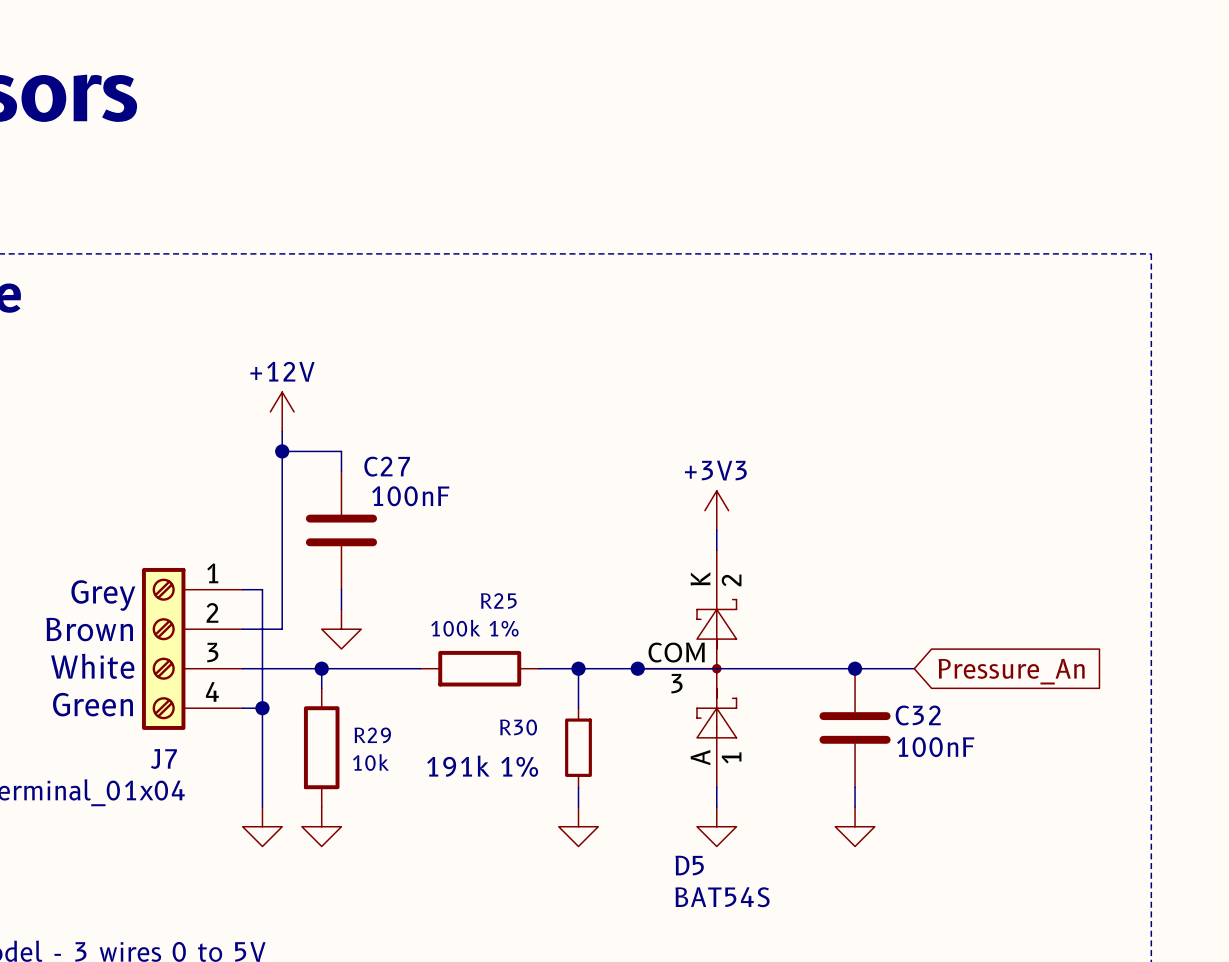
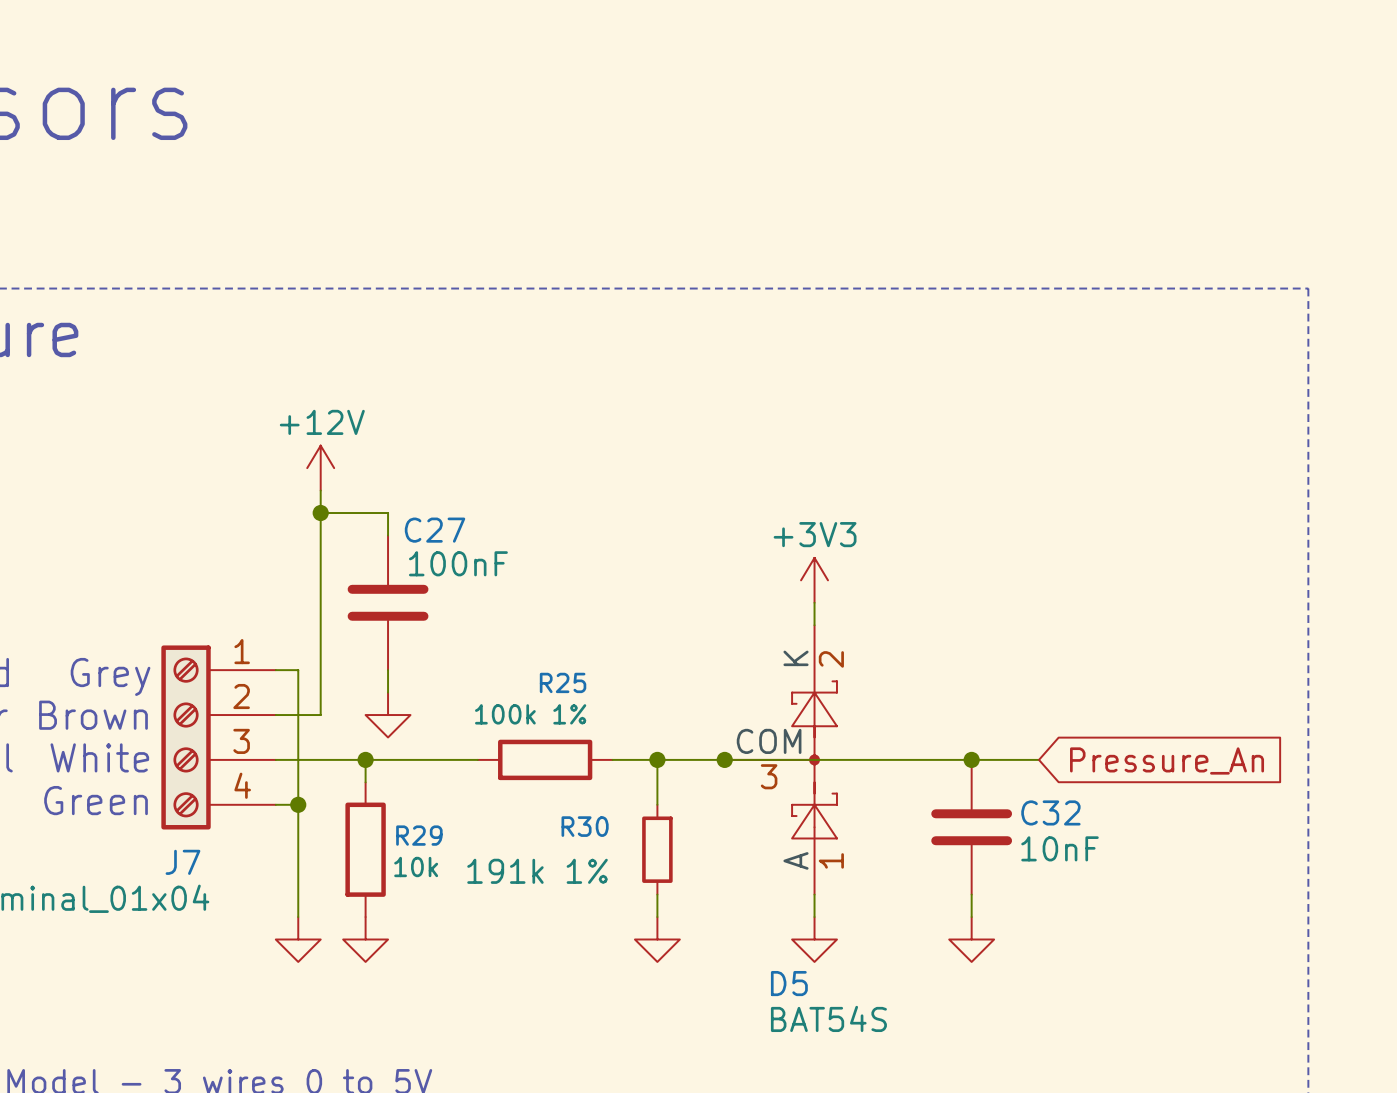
C32 value: 100nF (935, 747) -> 10nF (1060, 848)

